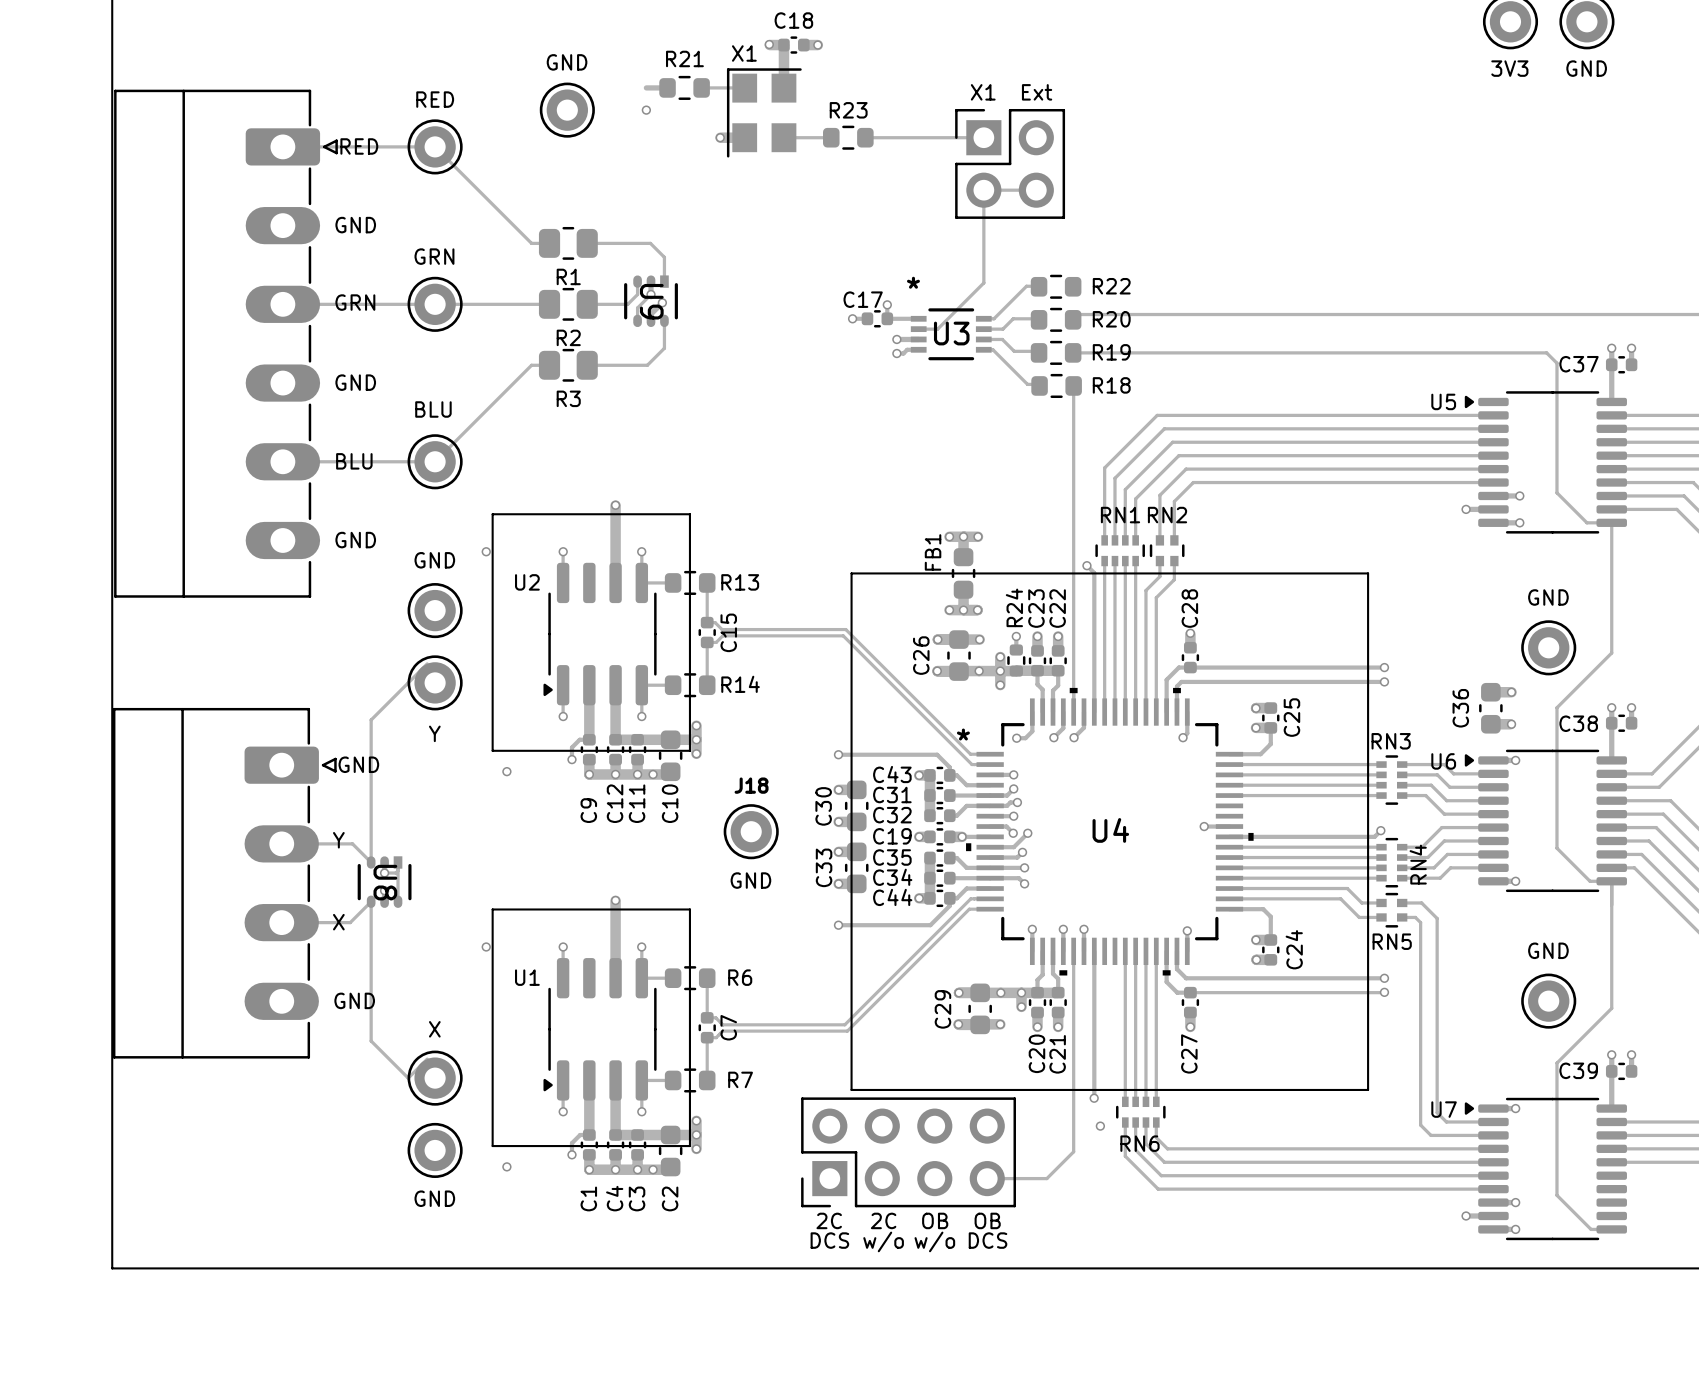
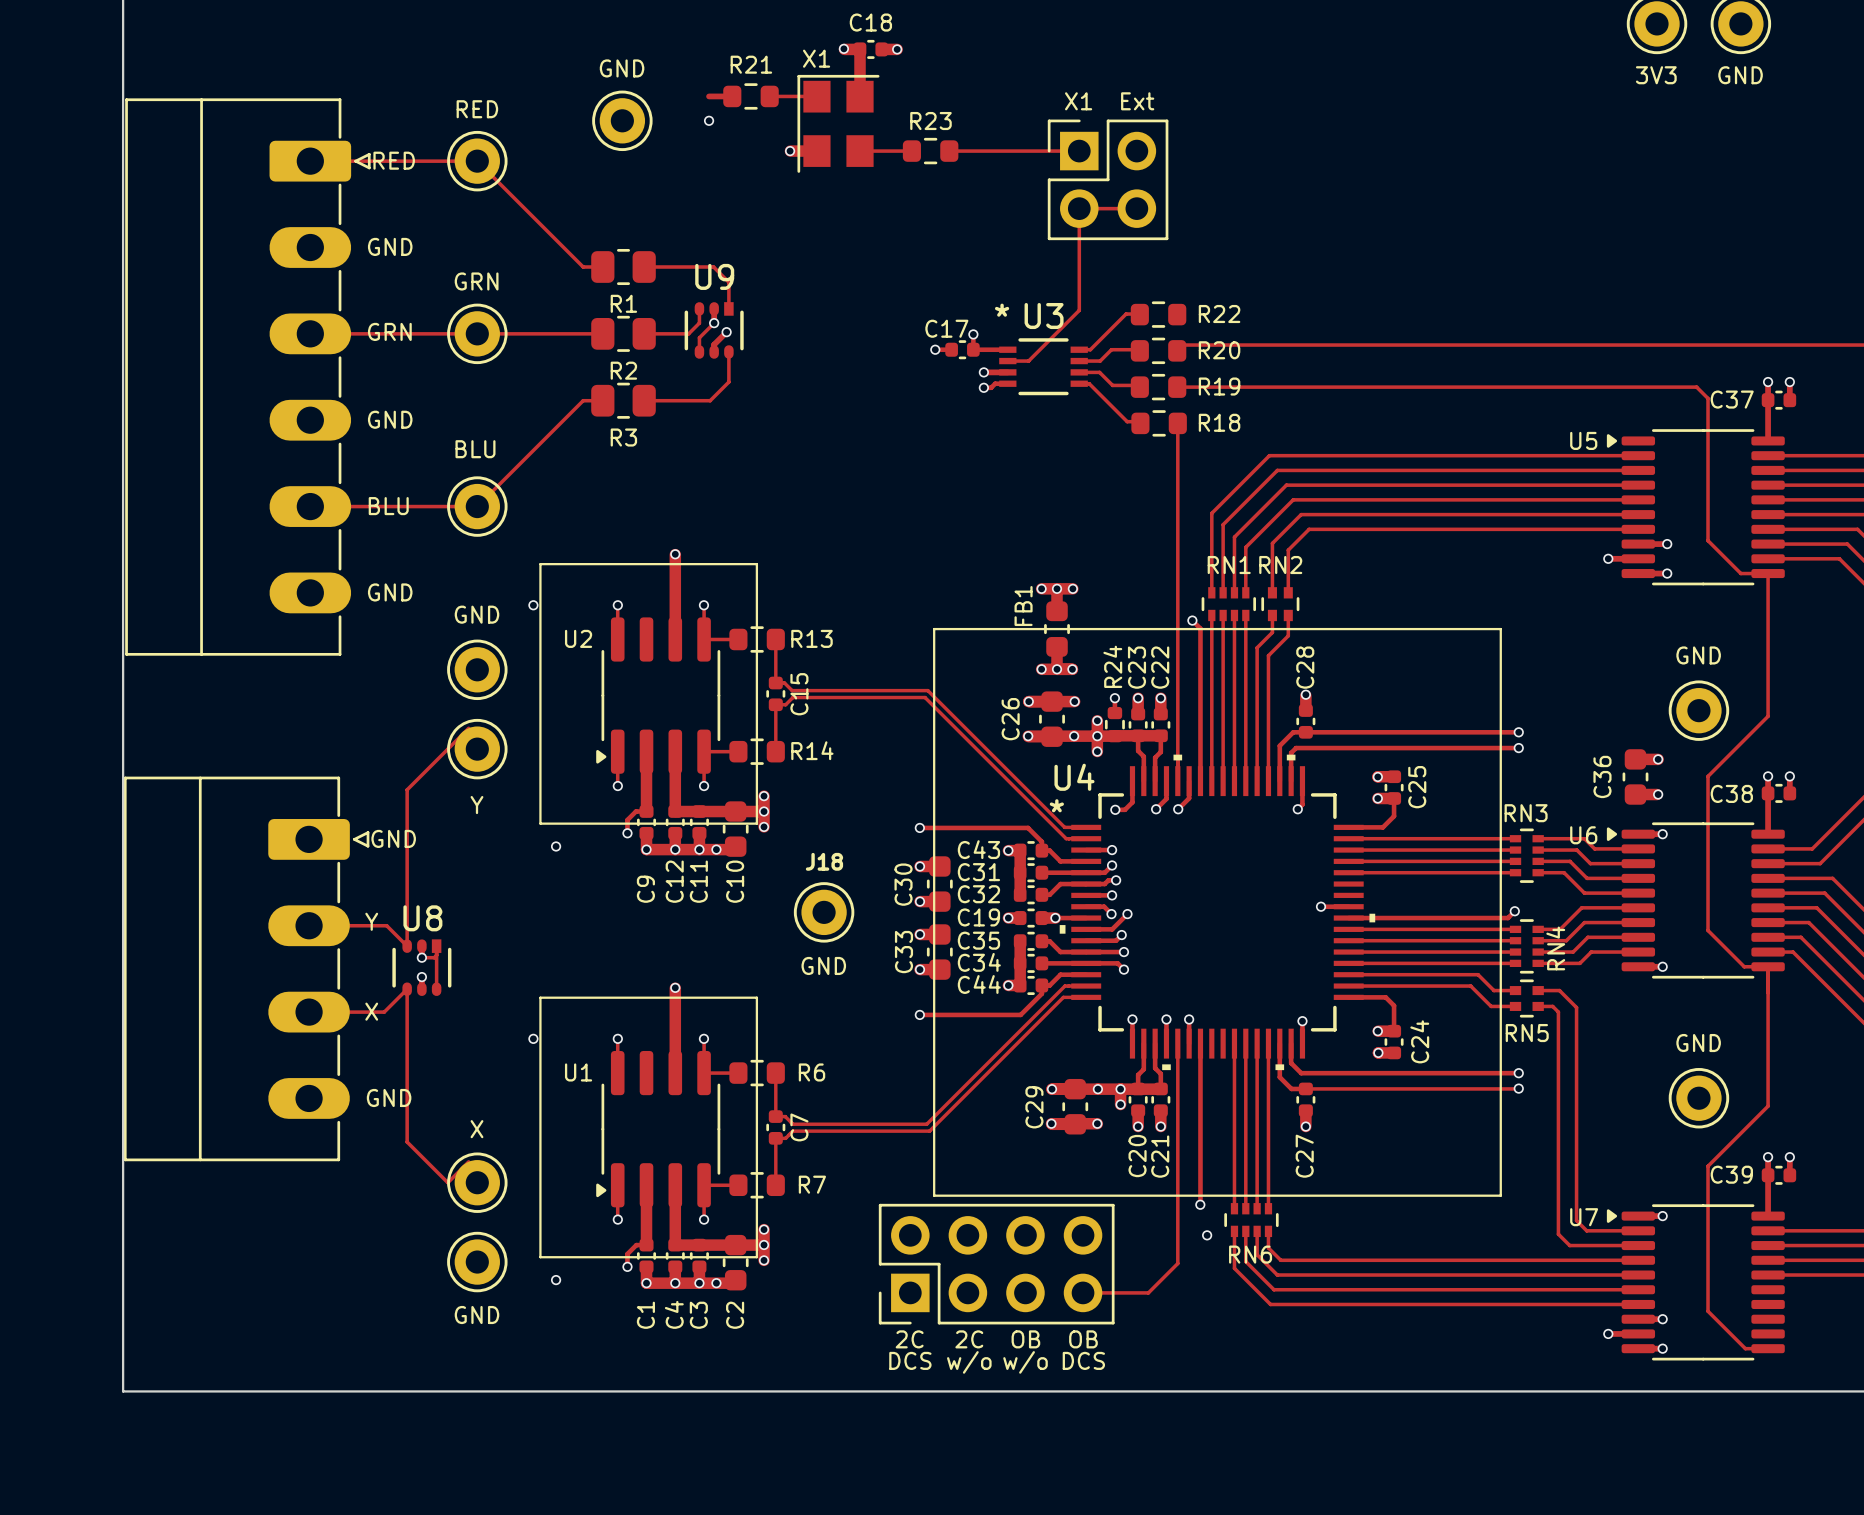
U9 name rotation: 0° (651, 301) -> 90° counterclockwise (714, 276)
U3 name position: U3 (951, 333) -> U3 (1044, 316)
U4 name position: U4 (1110, 830) -> U4 (1074, 777)
U8 name rotation: 0° (385, 882) -> 90° counterclockwise (422, 918)

